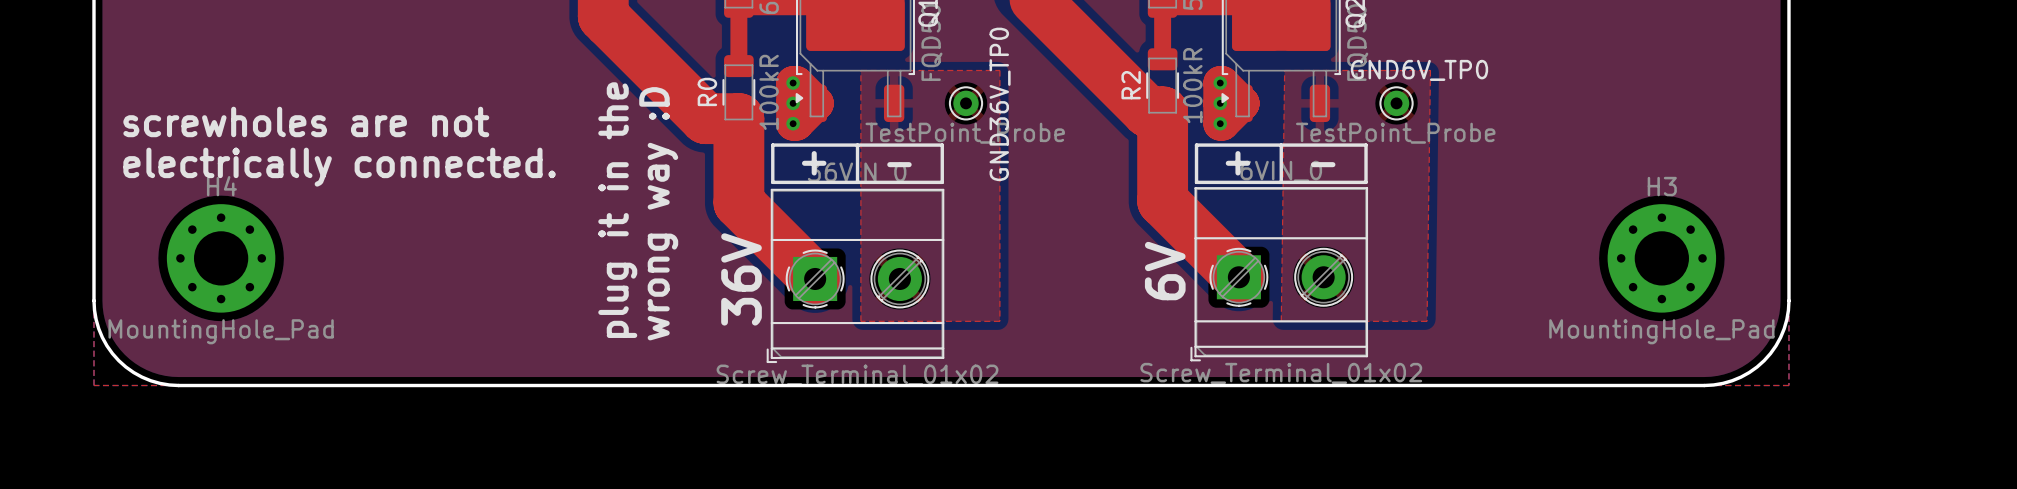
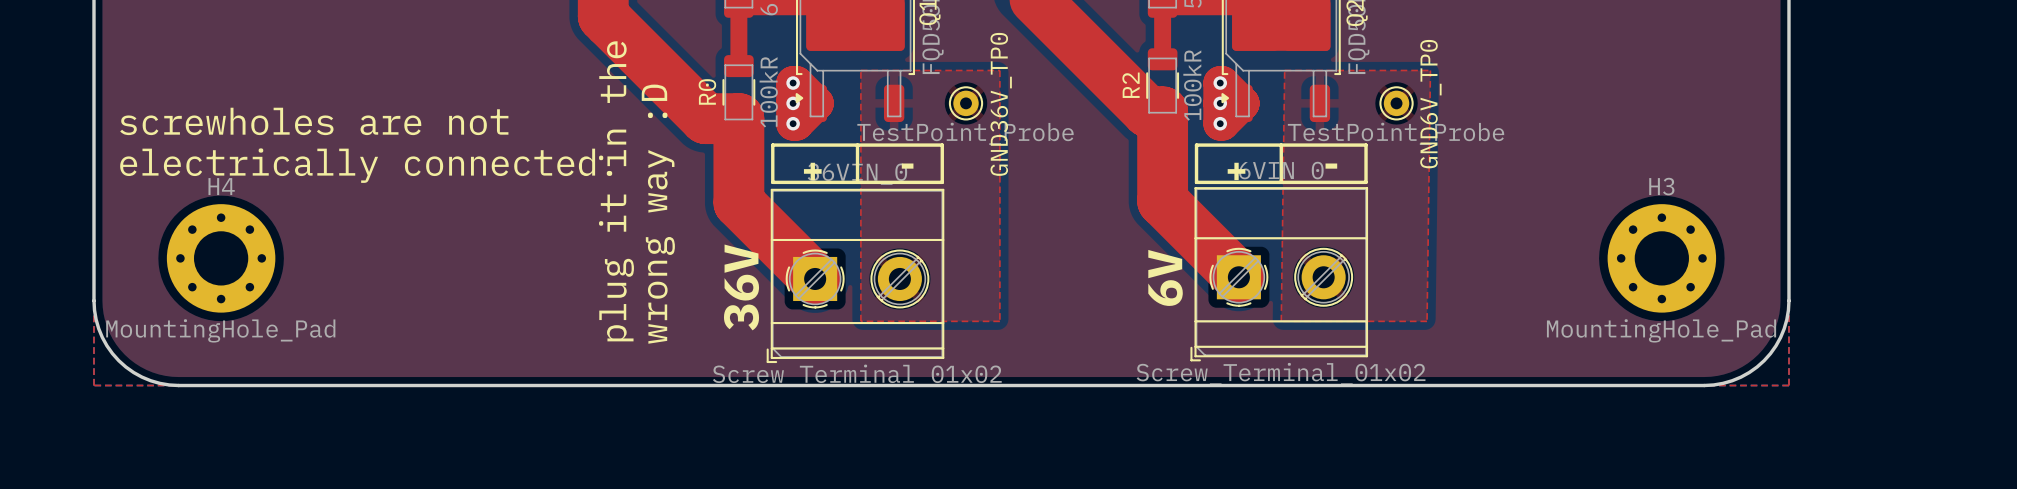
GND6V_TP0 name rotation: 0° (1419, 70) -> 90° counterclockwise (1430, 104)

